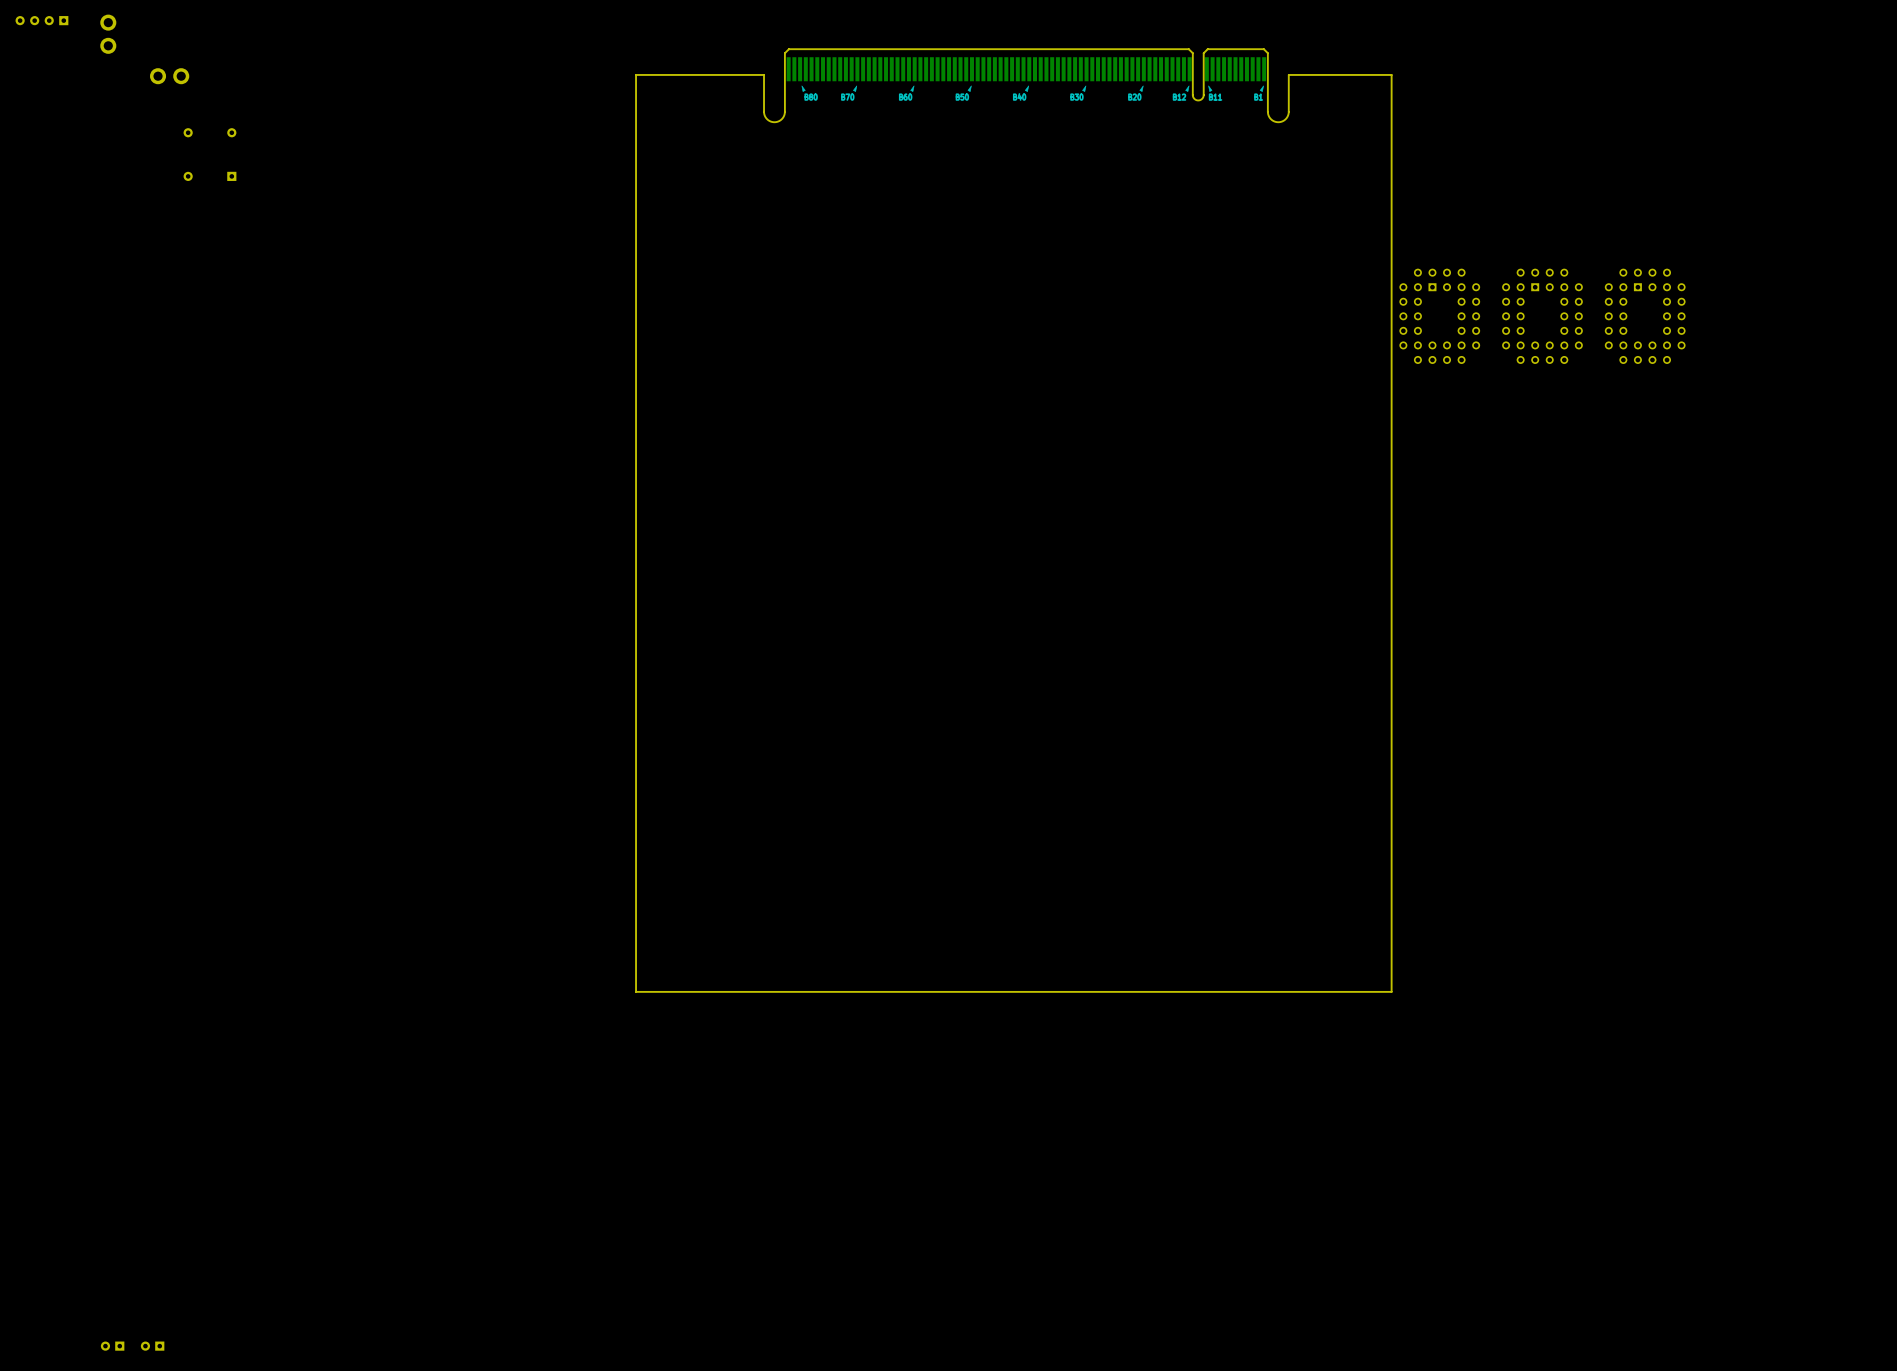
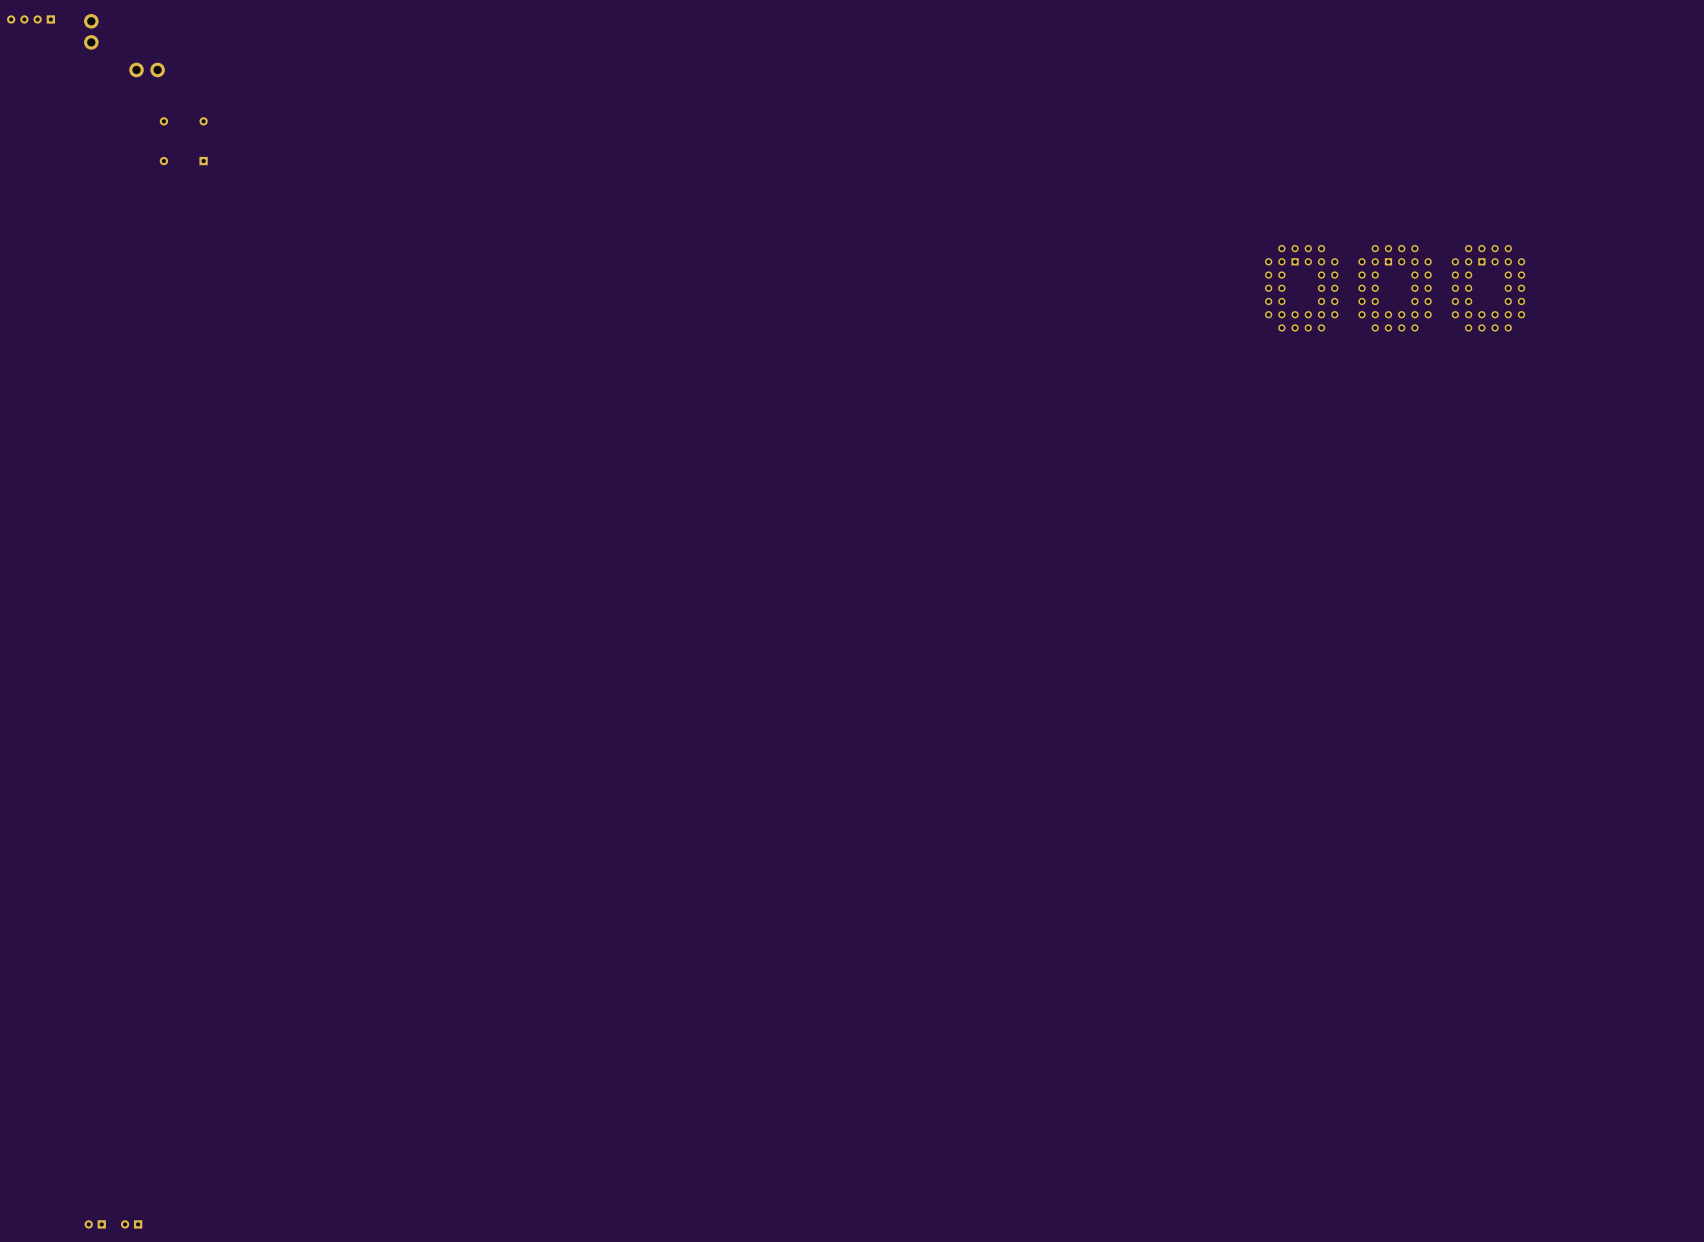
part: (1013, 520) -> none

